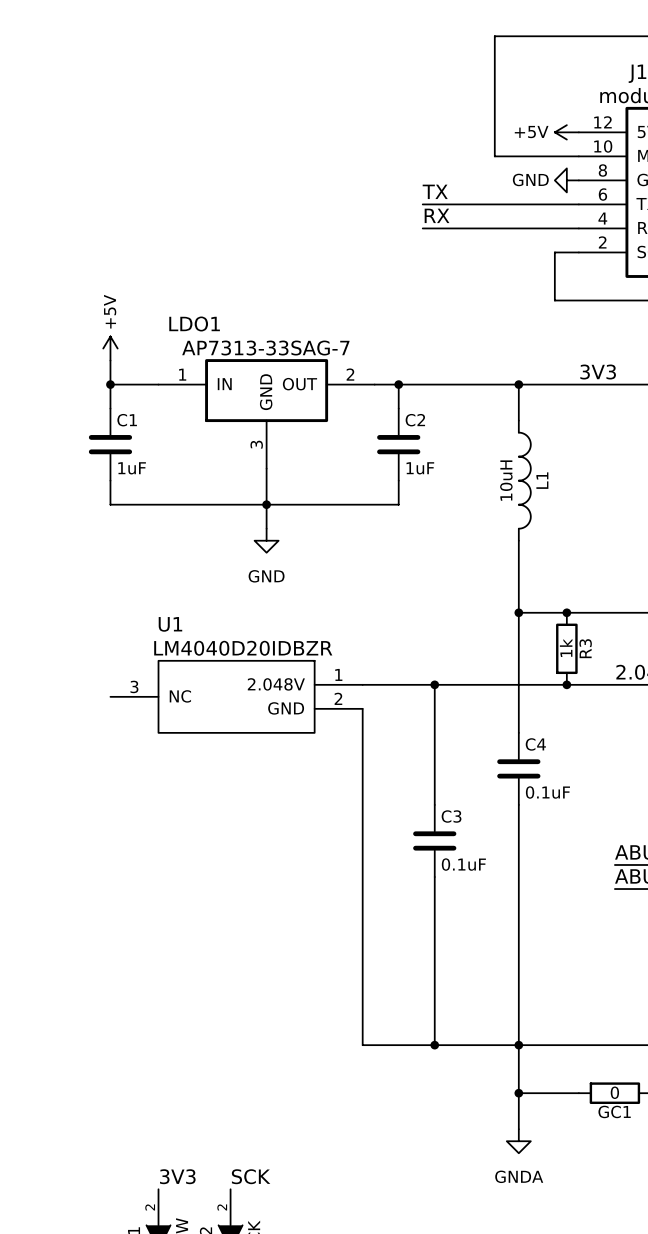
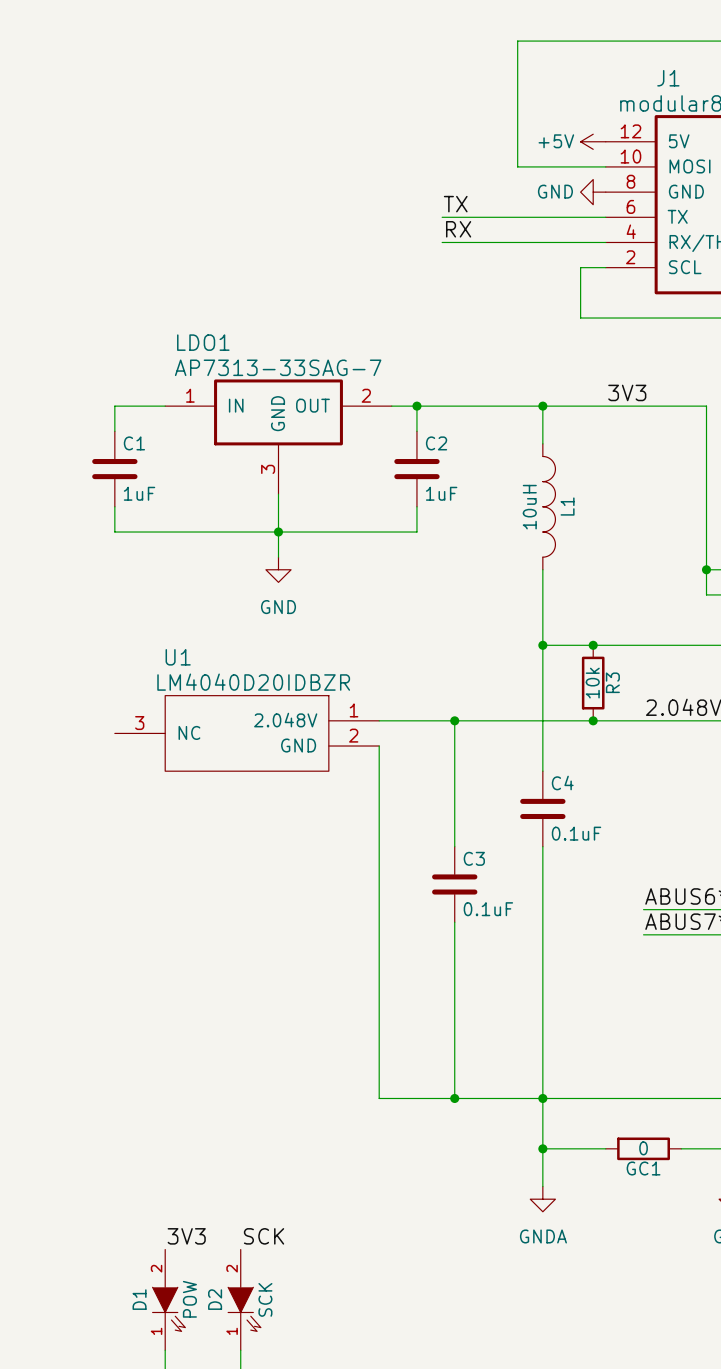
power symbol: +5V (110, 348) -> none
wire: (110, 360) (110, 384) -> none
junction: (110, 384) -> none
R3 value: 1k (566, 647) -> 10k (592, 683)

